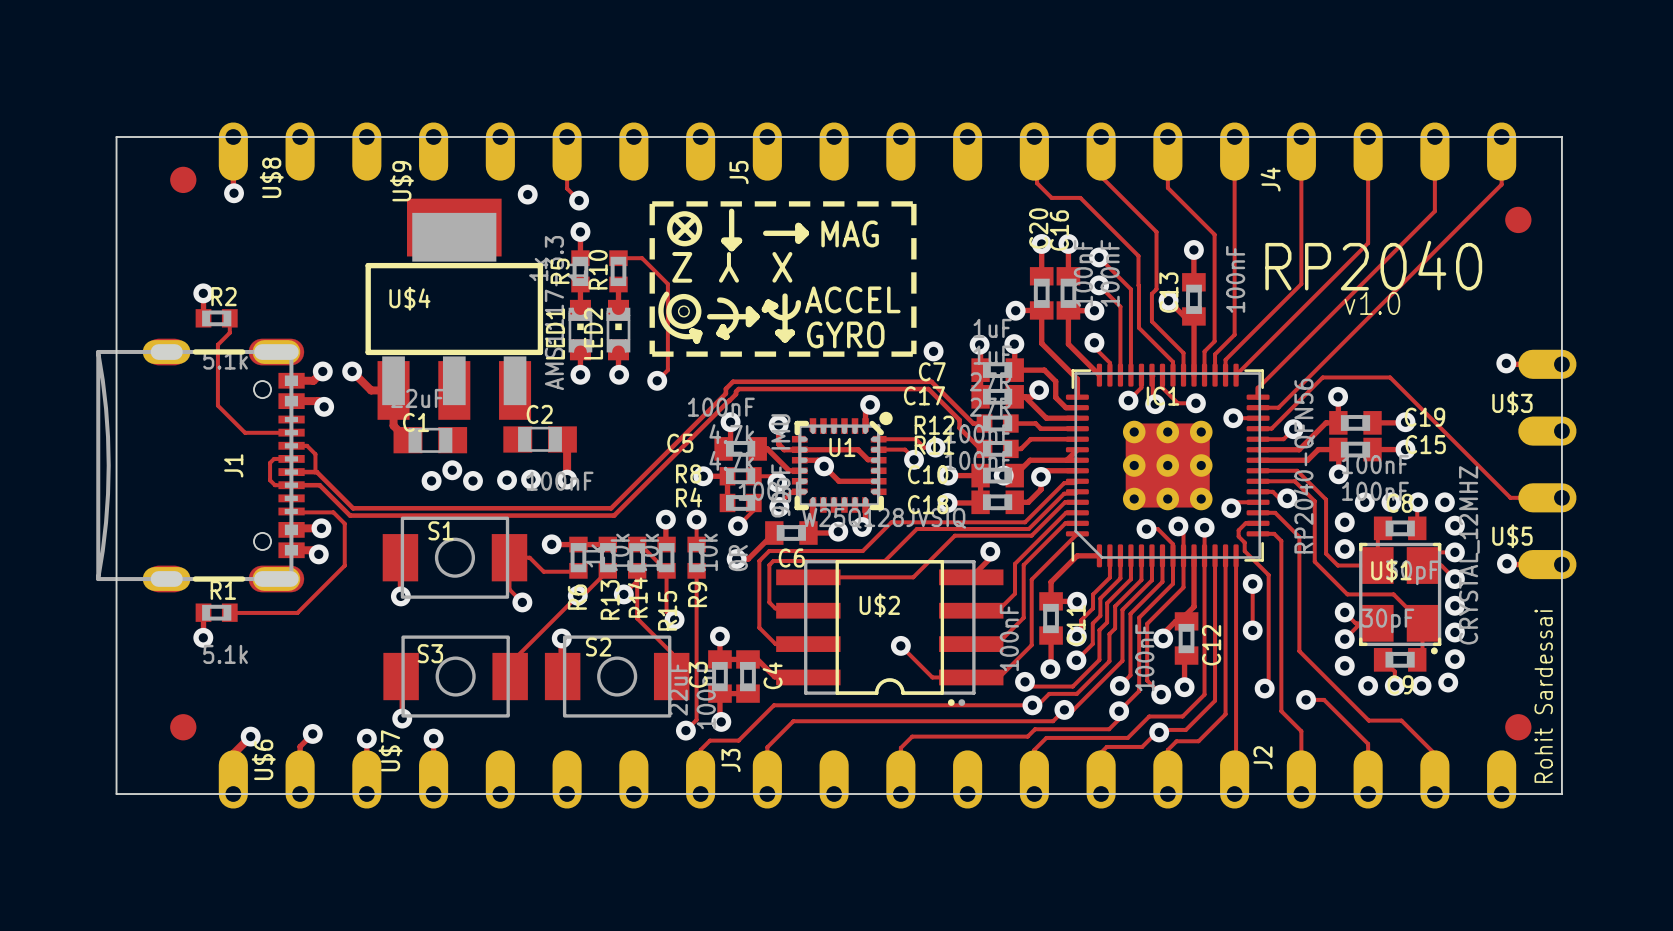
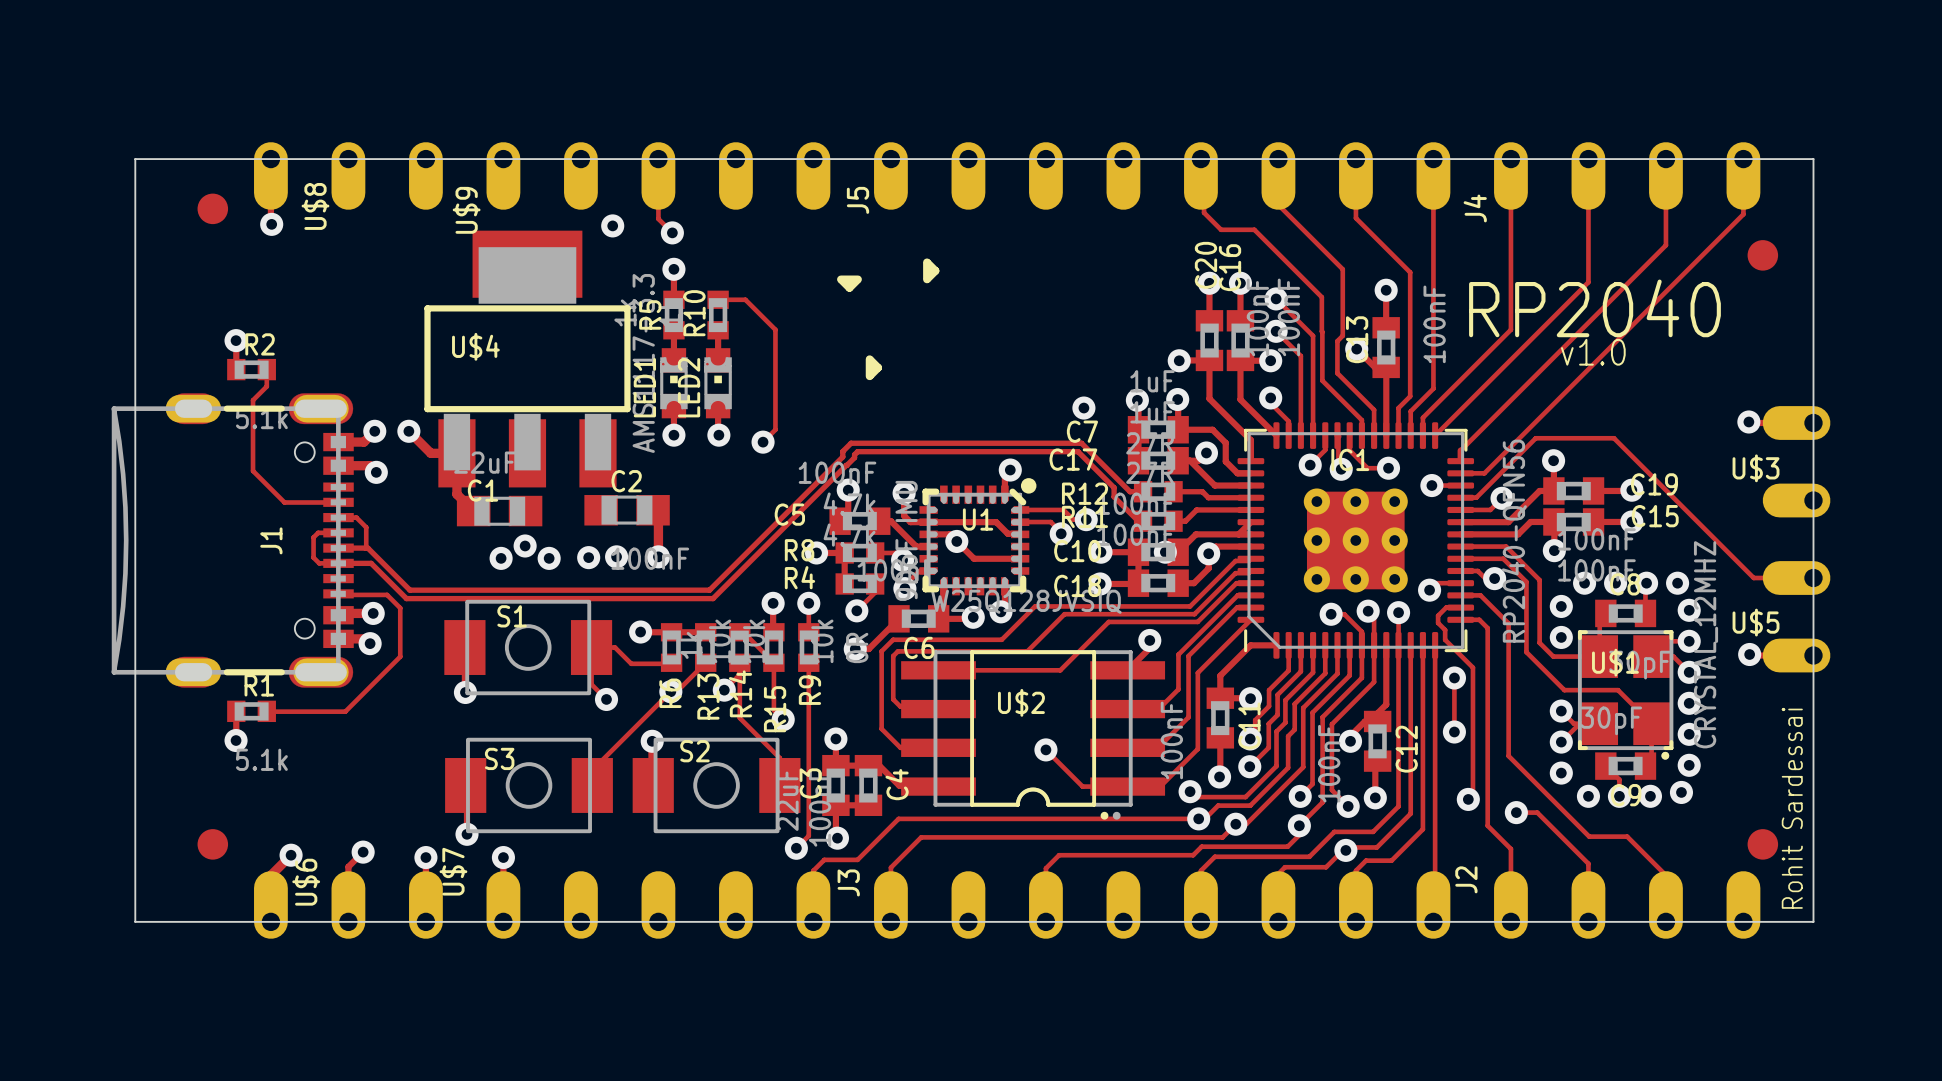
line: (913, 203) (913, 354) -> none
line: (914, 203) (652, 203) (652, 354) (914, 354) -> none
drawing: [667, 211, 703, 247] -> none
line: (731, 211) (731, 247) -> none
line: (676, 219) (692, 236) -> none
line: (692, 220) (676, 237) -> none
line: (765, 233) (805, 233) -> none
text: MAG (850, 233) -> none
text: Z (682, 267) -> none
text: Y (728, 267) -> none
text: X (782, 267) -> none
drawing: [666, 293, 702, 330] -> none
line: (666, 294) (660, 308) (662, 318) (666, 326) (679, 335) (688, 336) (698, 334) -> none
line: (785, 296) (785, 339) -> none
text: ACCEL (852, 299) -> none
line: (719, 300) (731, 304) (736, 316) (731, 328) (719, 333) -> none
line: (768, 302) (765, 309) (775, 306) (768, 302) -> none
line: (768, 302) (772, 313) (783, 317) (794, 313) (798, 302) -> none
line: (709, 316) (756, 316) -> none
line: (692, 331) (699, 333) (696, 340) (692, 331) -> none
line: (719, 333) (726, 336) (722, 327) (719, 333) -> none
text: GYRO (845, 334) -> none
line: (785, 339) (791, 332) (778, 332) (785, 339) -> none

